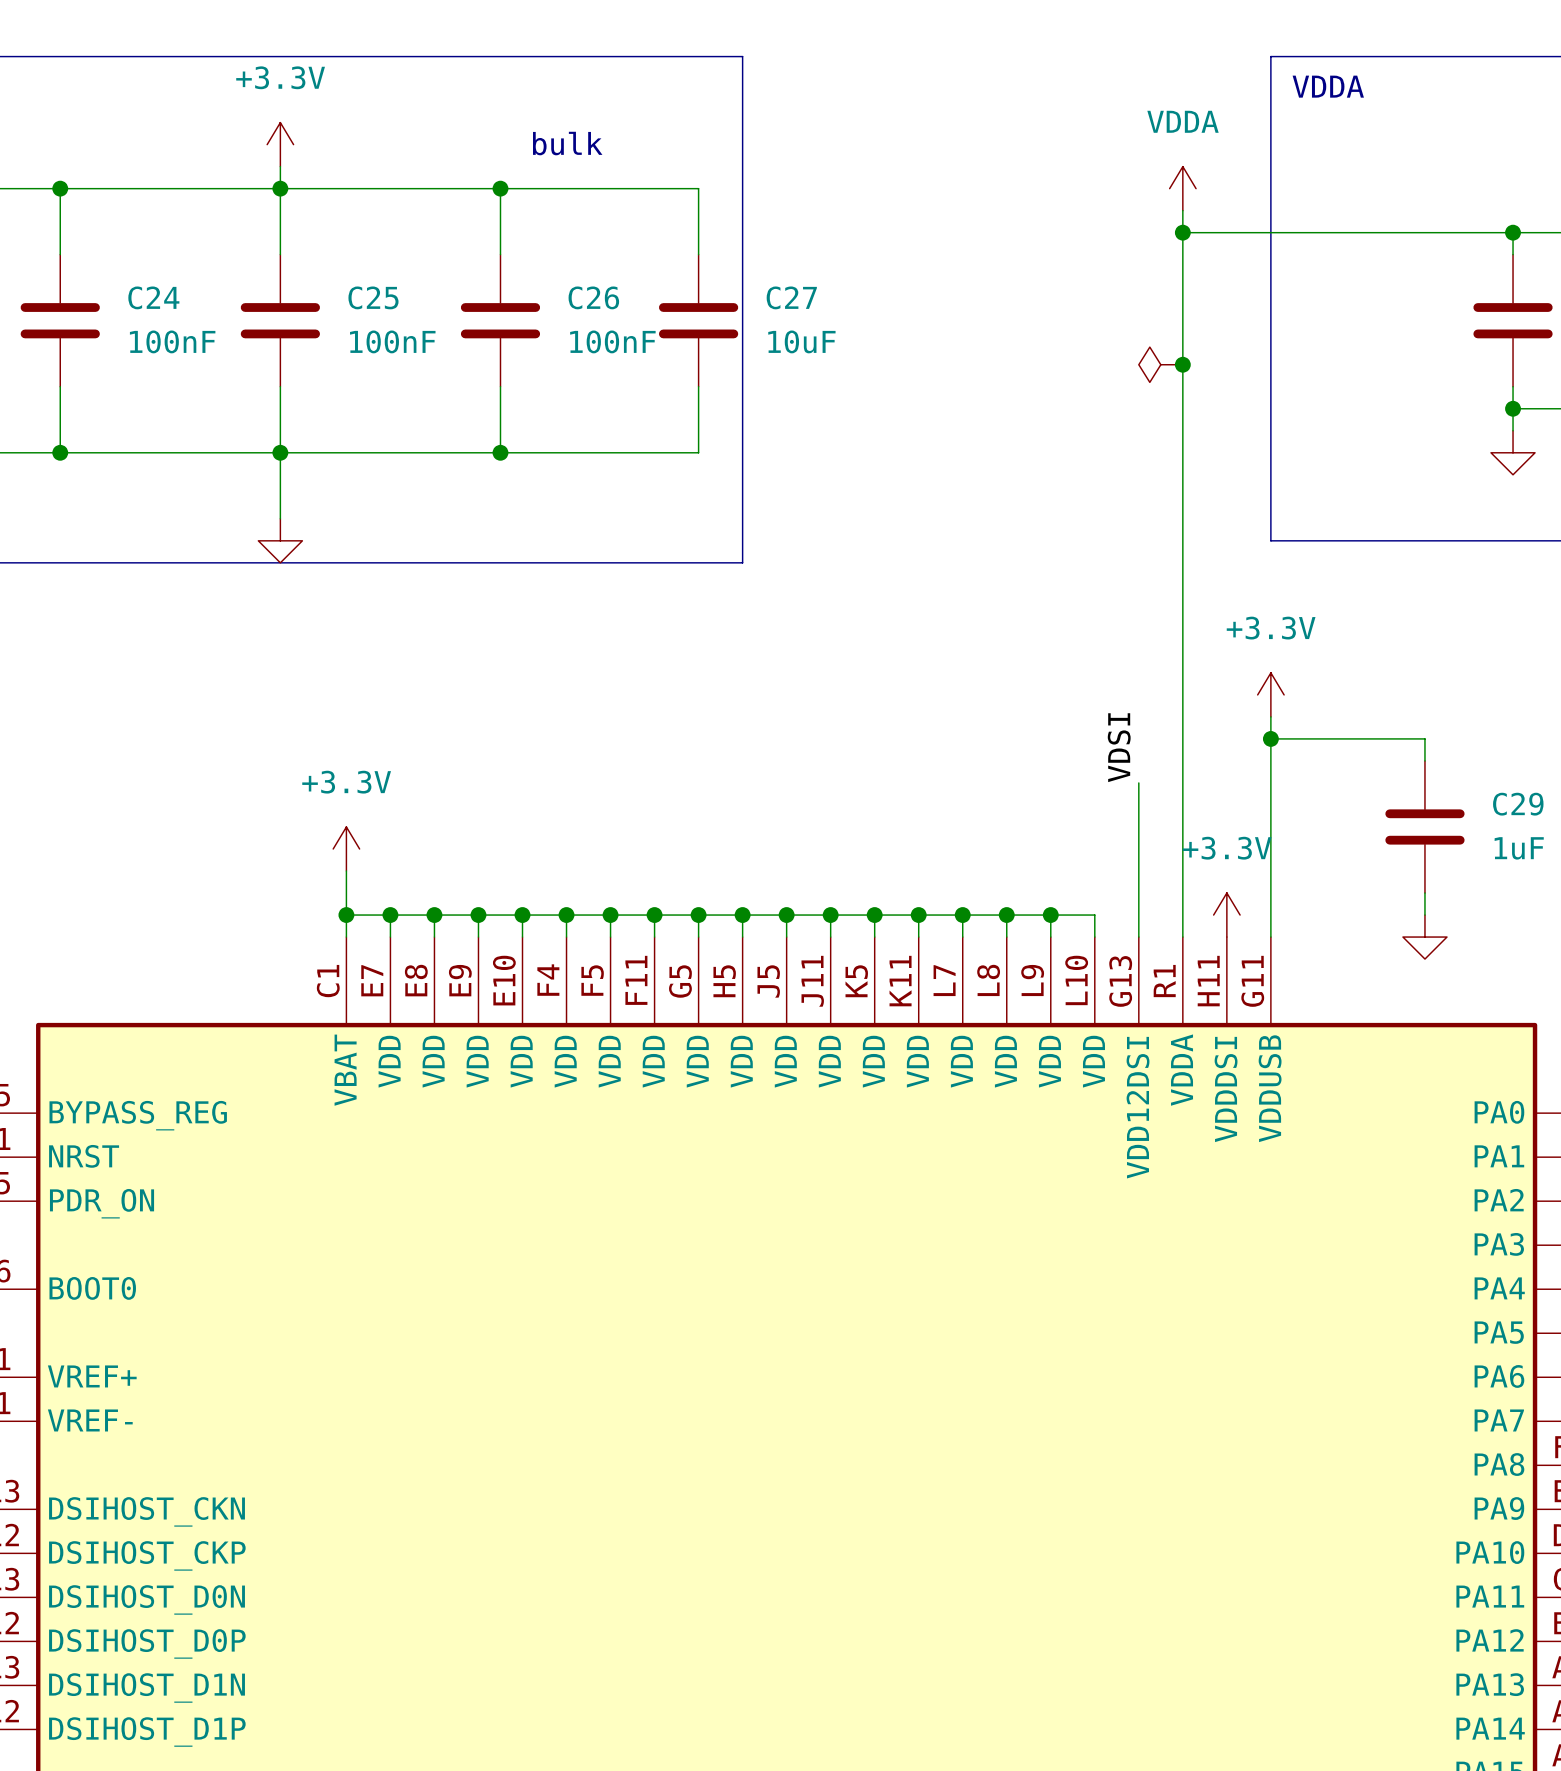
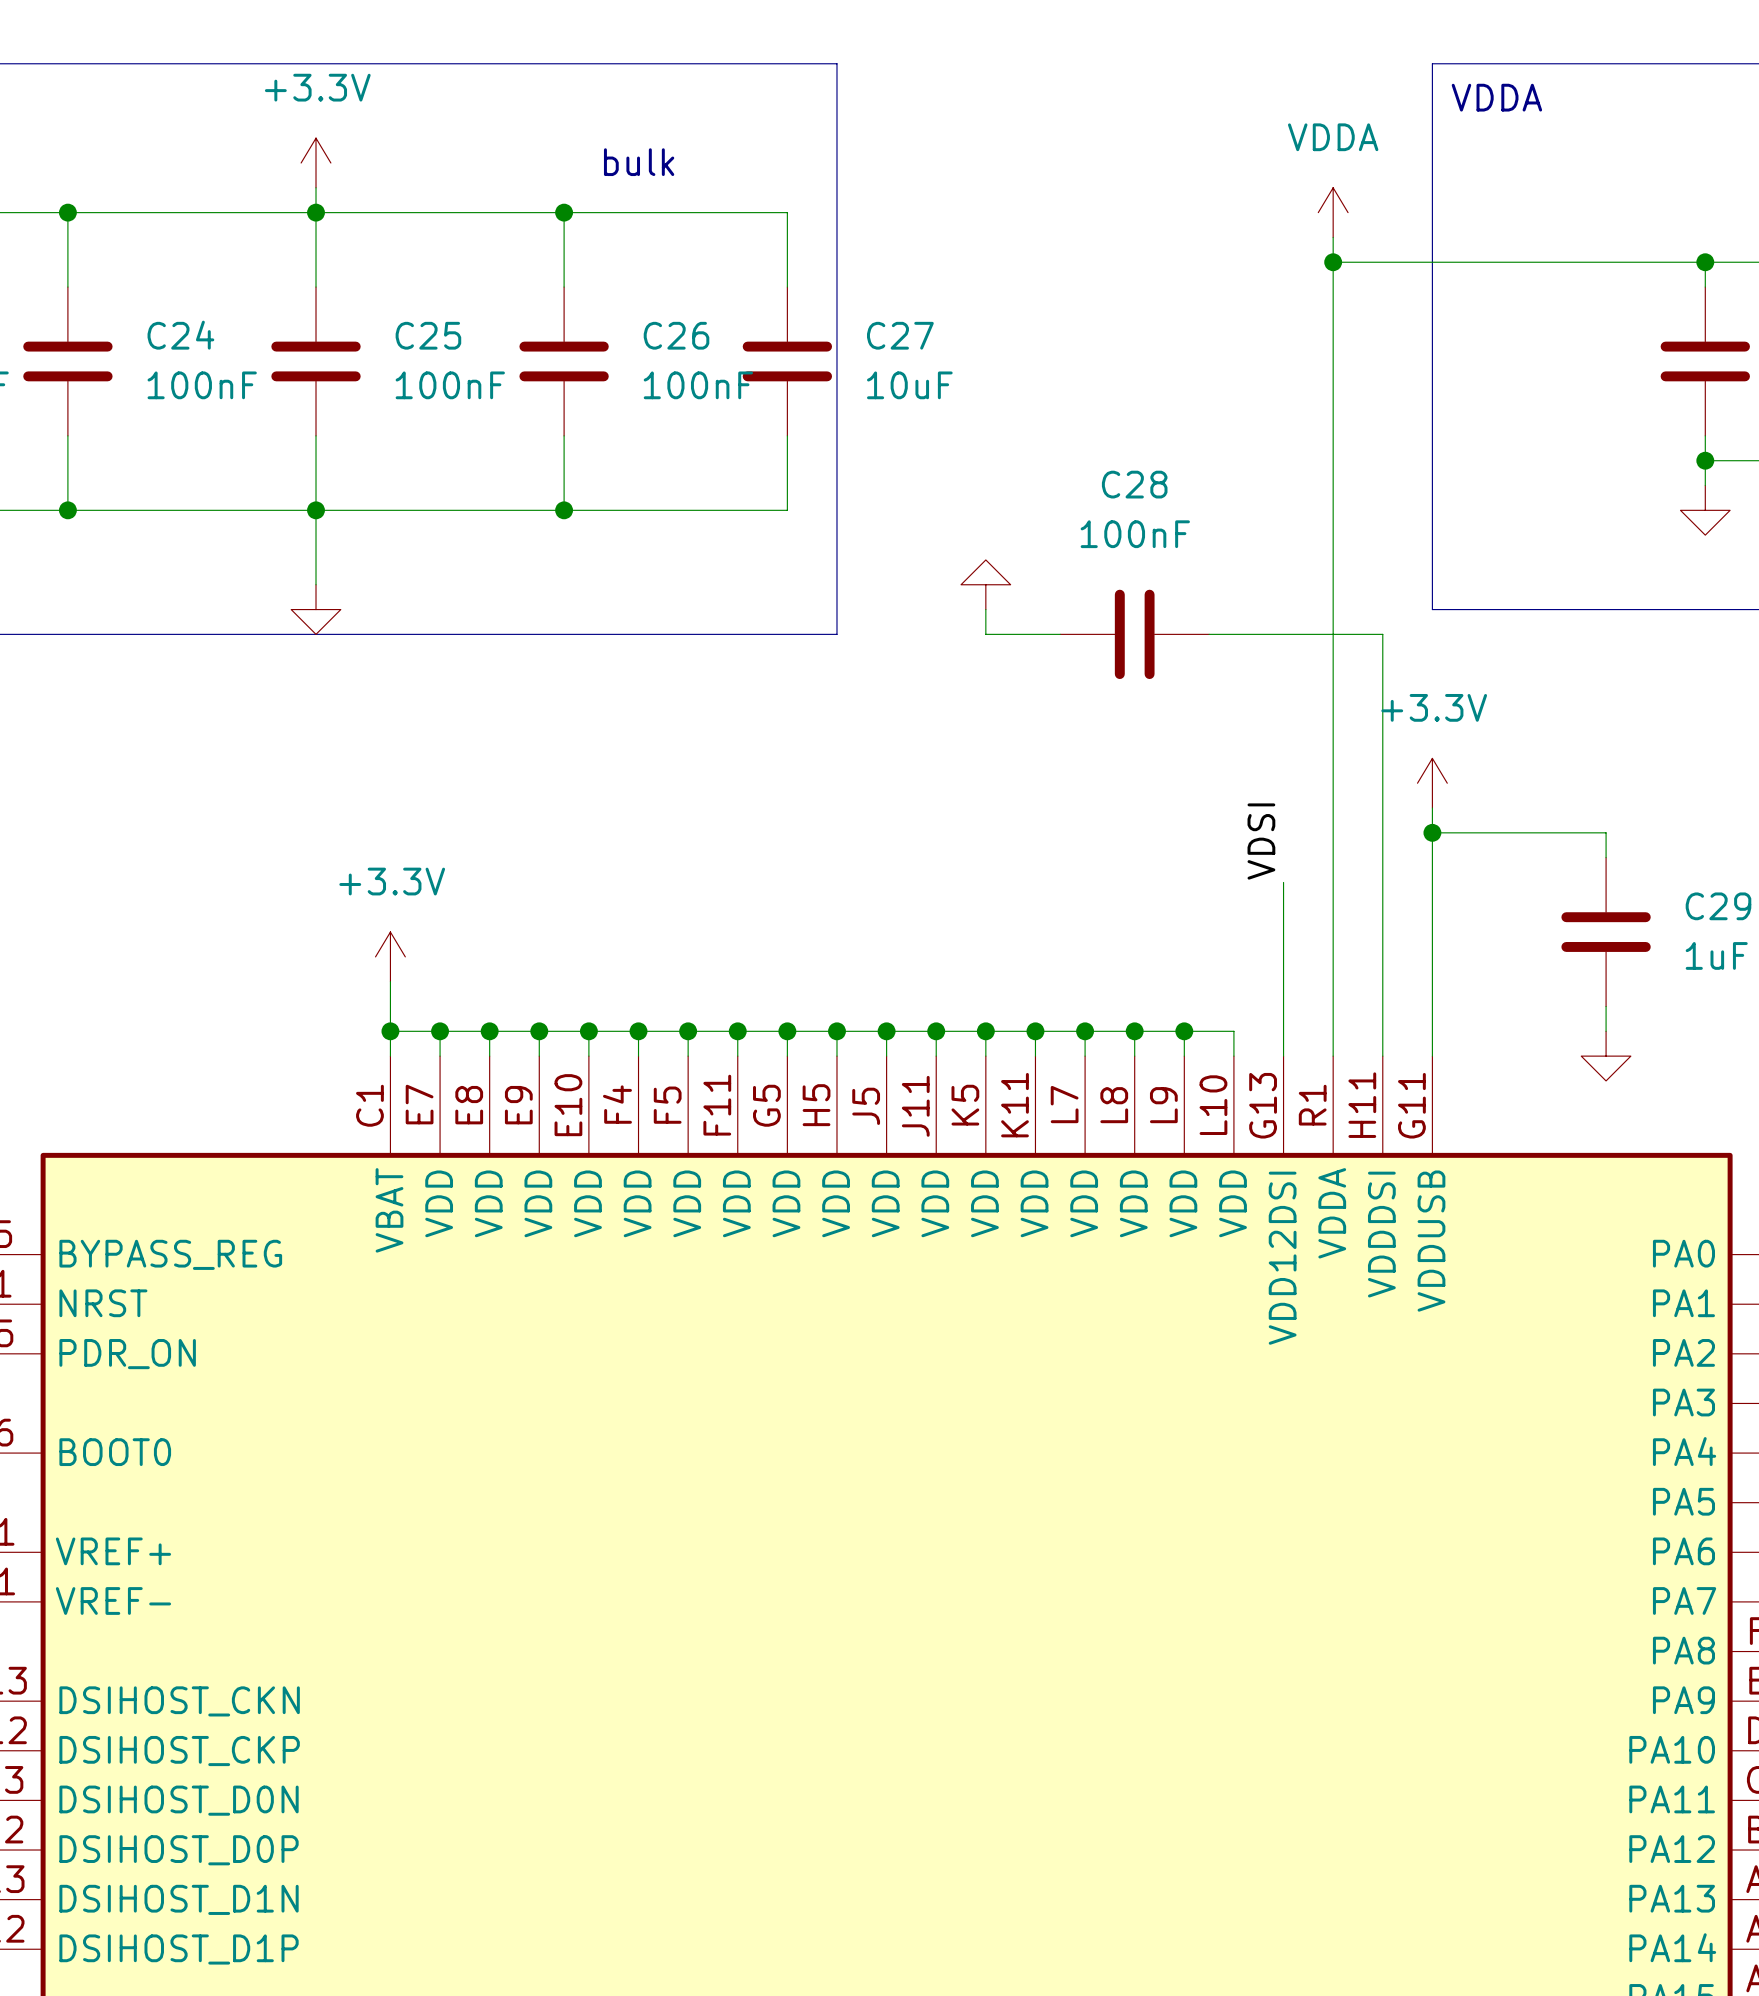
power symbol: (1160, 364) -> none
junction: (1182, 364) -> none
power symbol: none -> (985, 584)
wire: none -> (985, 609) (985, 634) (1060, 634)
C28: none -> 100nF (1134, 634)
wire: none -> (1209, 634) (1382, 634) (1382, 1056)
power symbol: +3.3V (1226, 915) -> none

